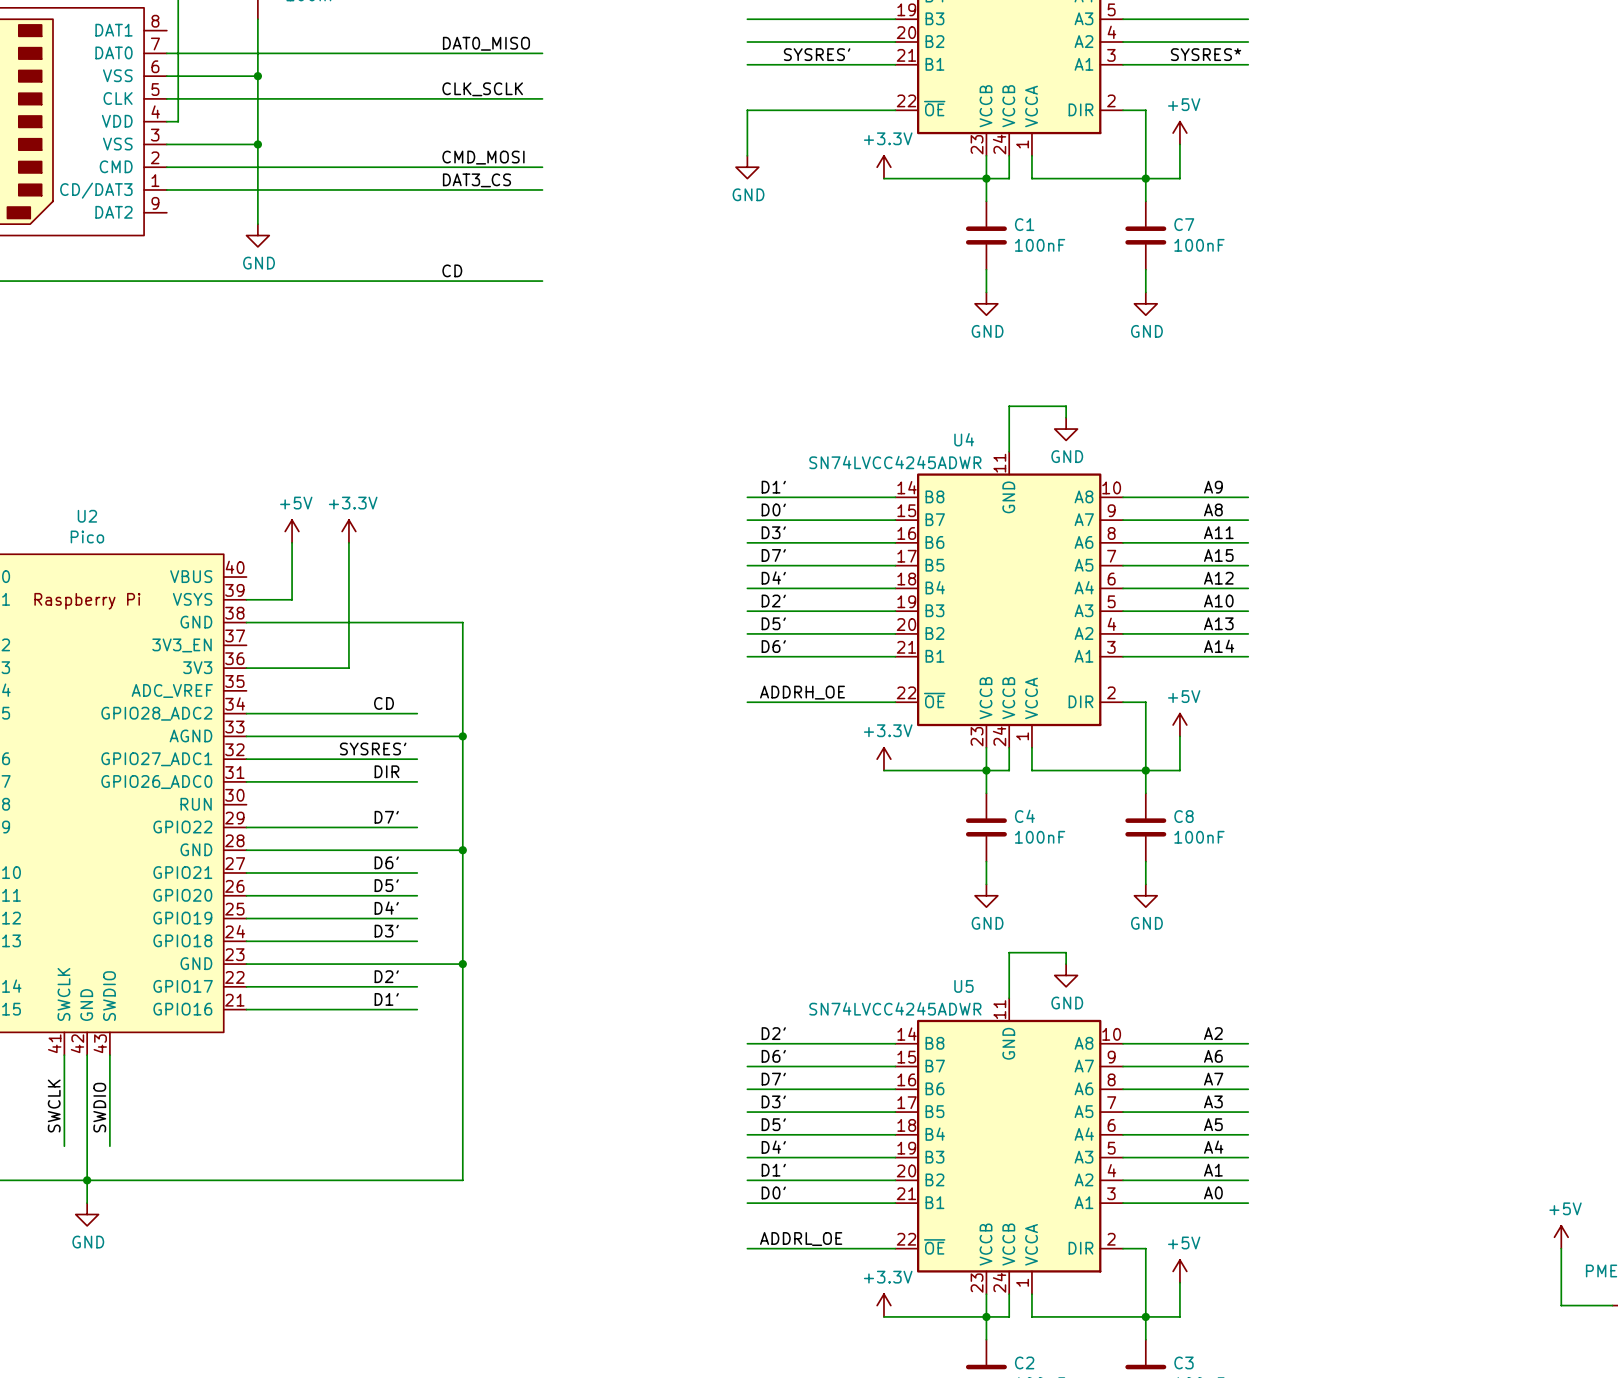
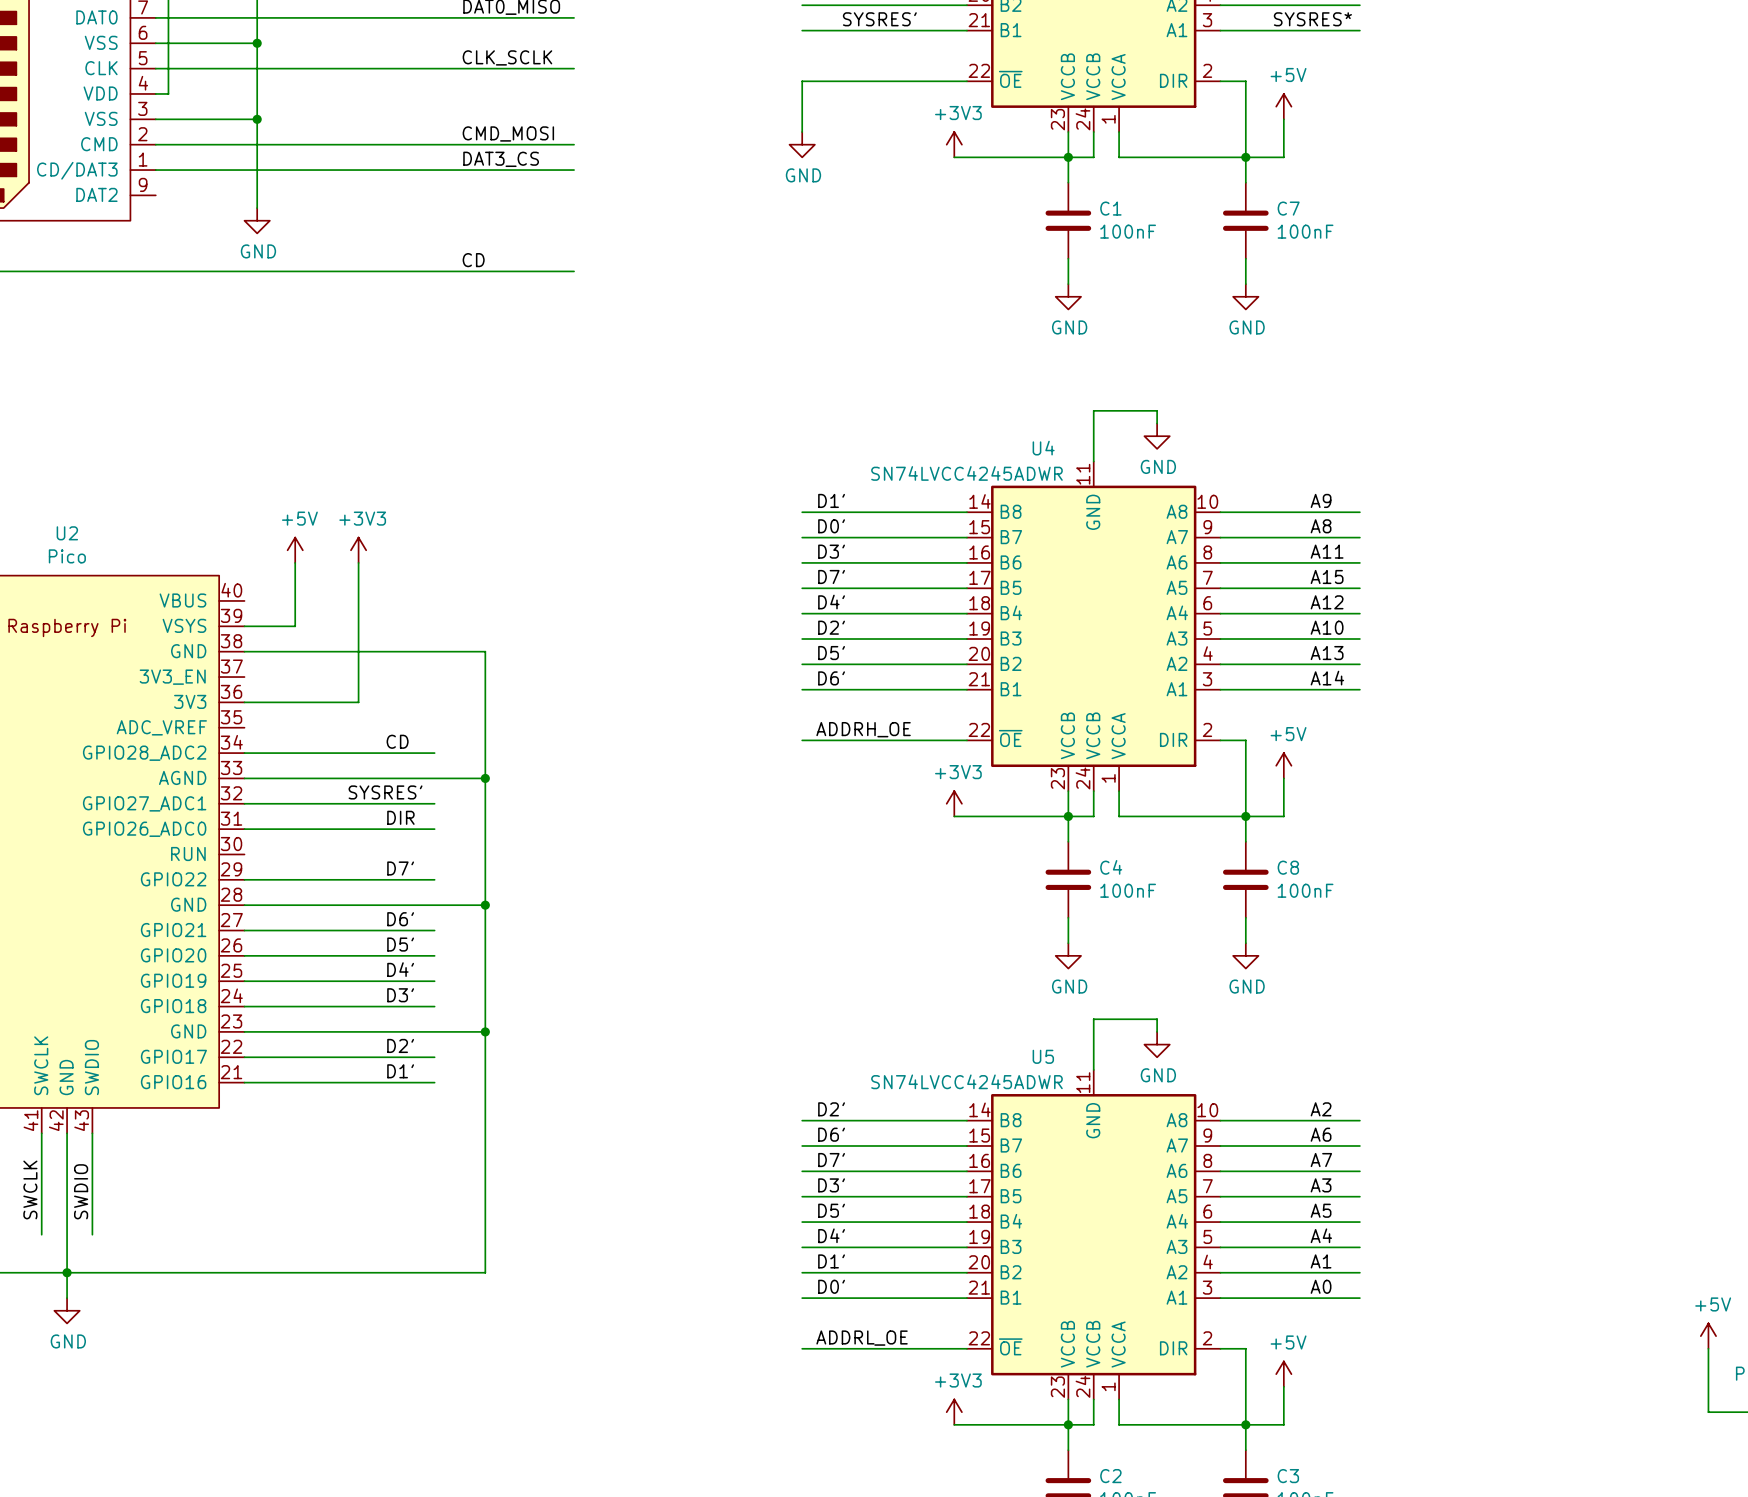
power symbol: +3.3V (883, 167) -> +3V3 (954, 144)
power symbol: +3.3V (348, 531) -> +3V3 (358, 550)
power symbol: +3.3V (883, 759) -> +3V3 (954, 803)
power symbol: +3.3V (883, 1305) -> +3V3 (954, 1412)

